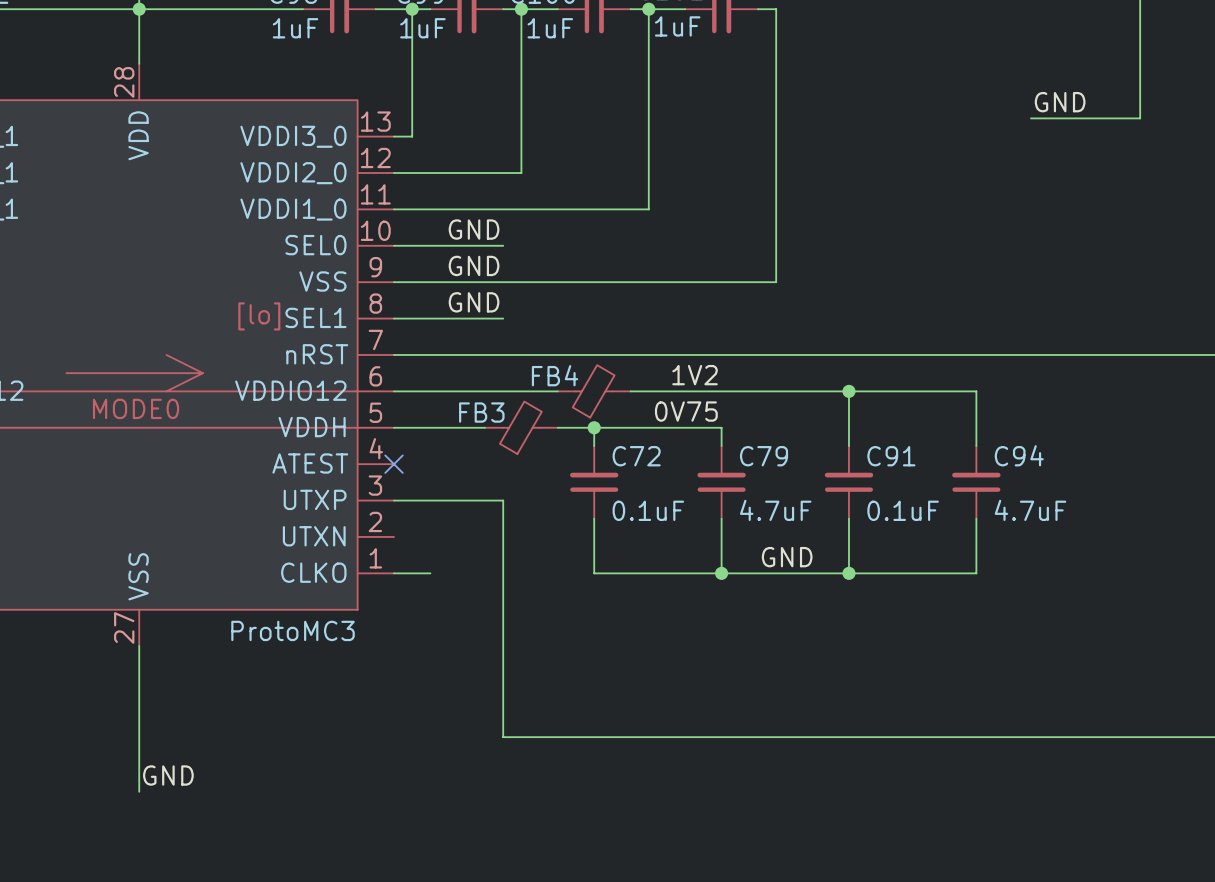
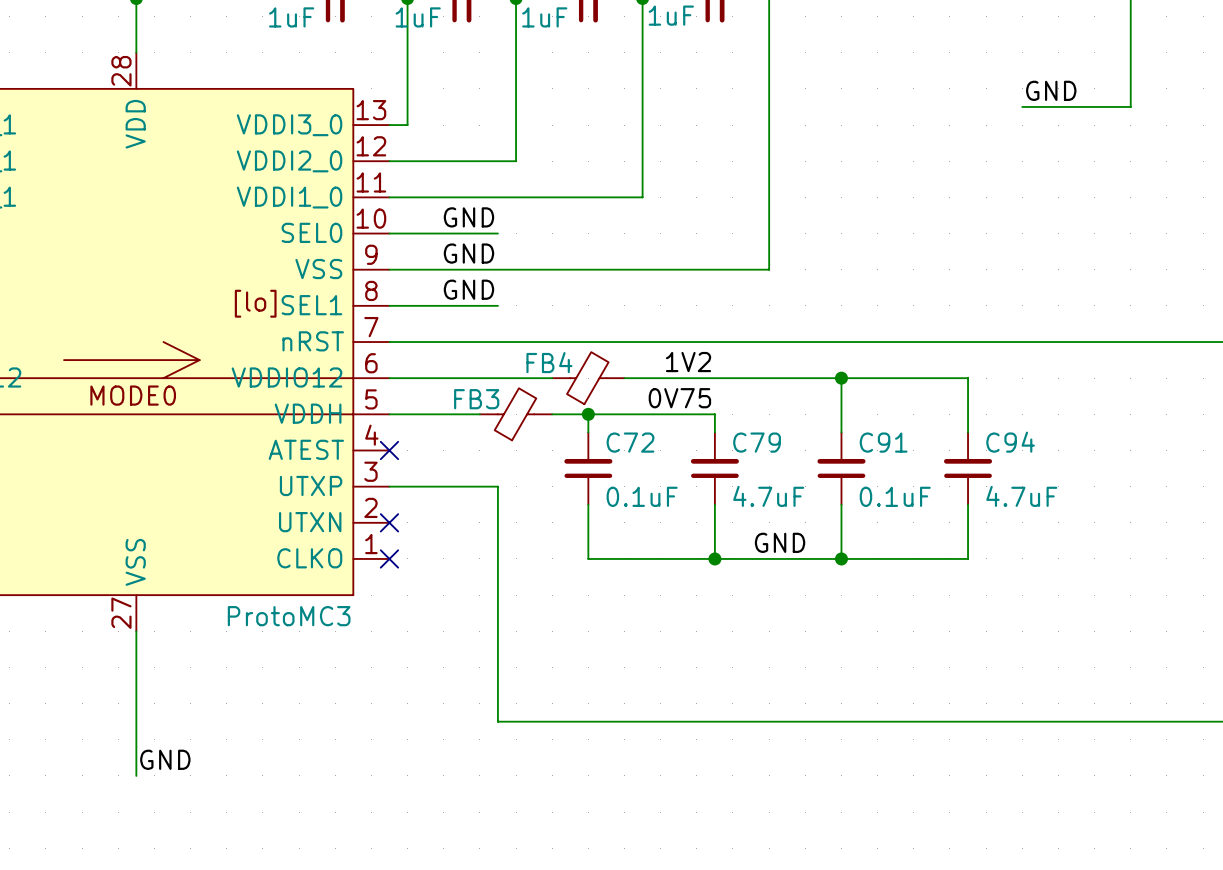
no-connect mark: none -> (389, 522)
wire: (394, 573) (430, 573) -> none
no-connect mark: none -> (389, 558)

